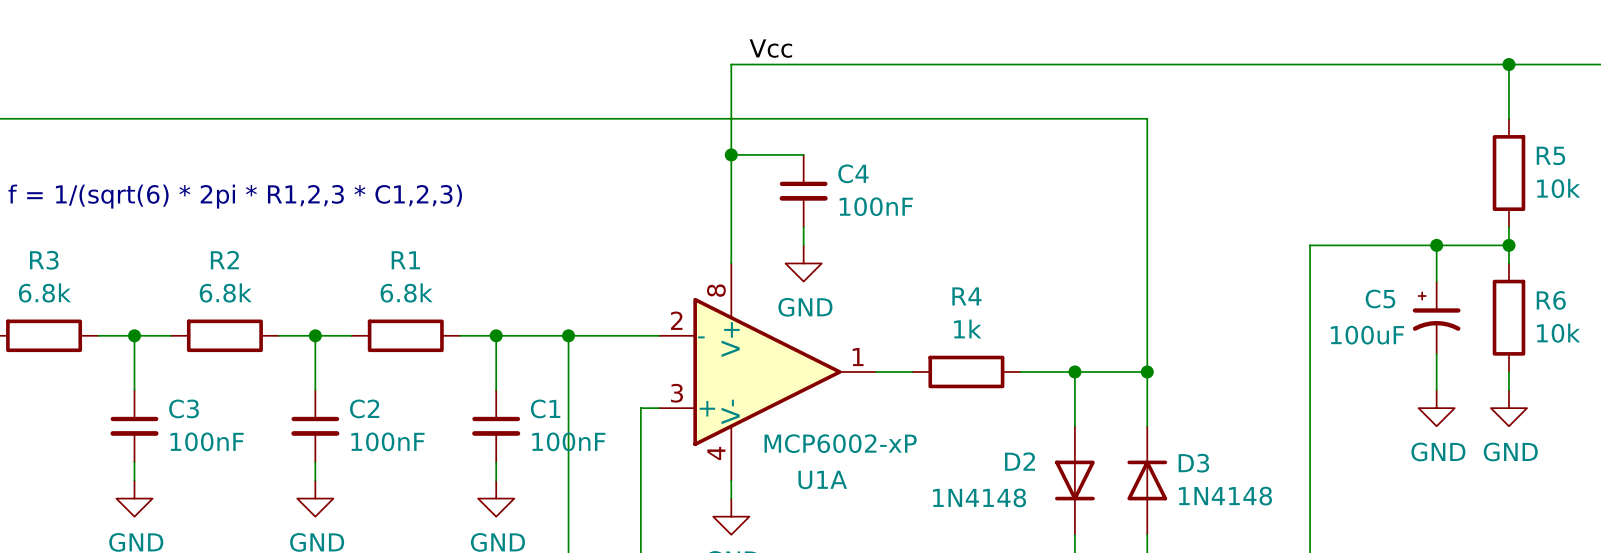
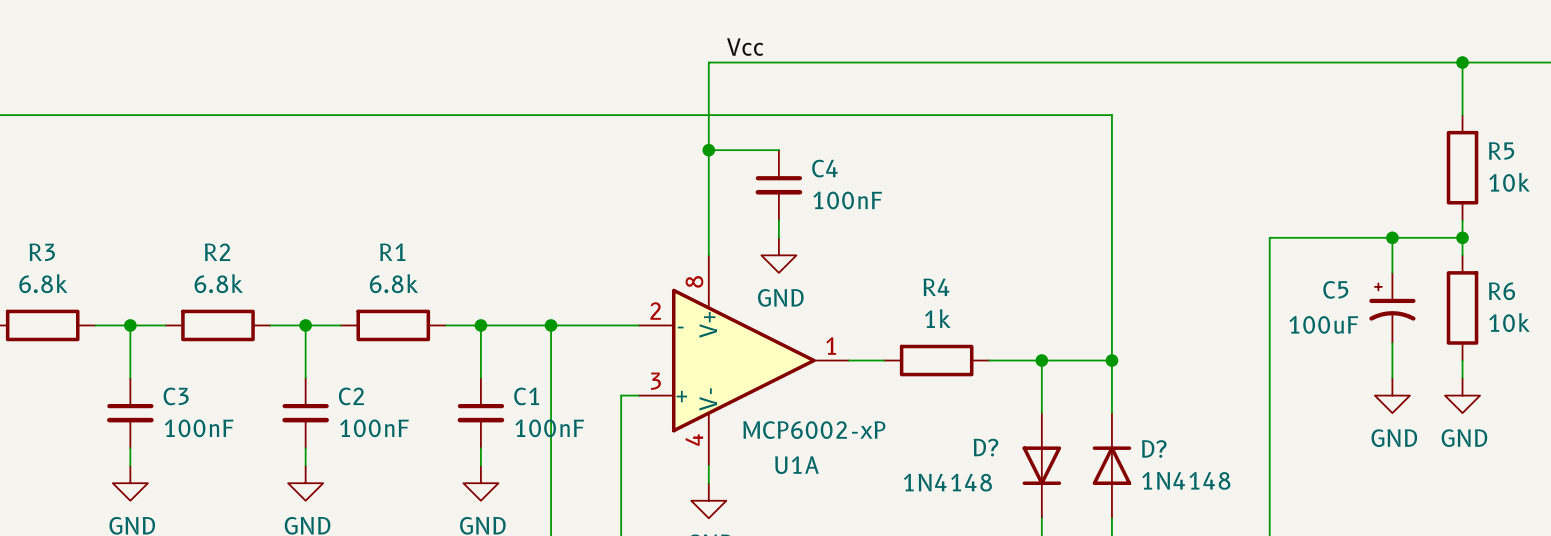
text: f = 1/(sqrt(6) * 2pi * R1,2,3 * C1,2,3) (235, 196) -> none
D2 name: D2 (1020, 461) -> D? (985, 447)
D3 name: D3 (1193, 463) -> D? (1154, 449)

